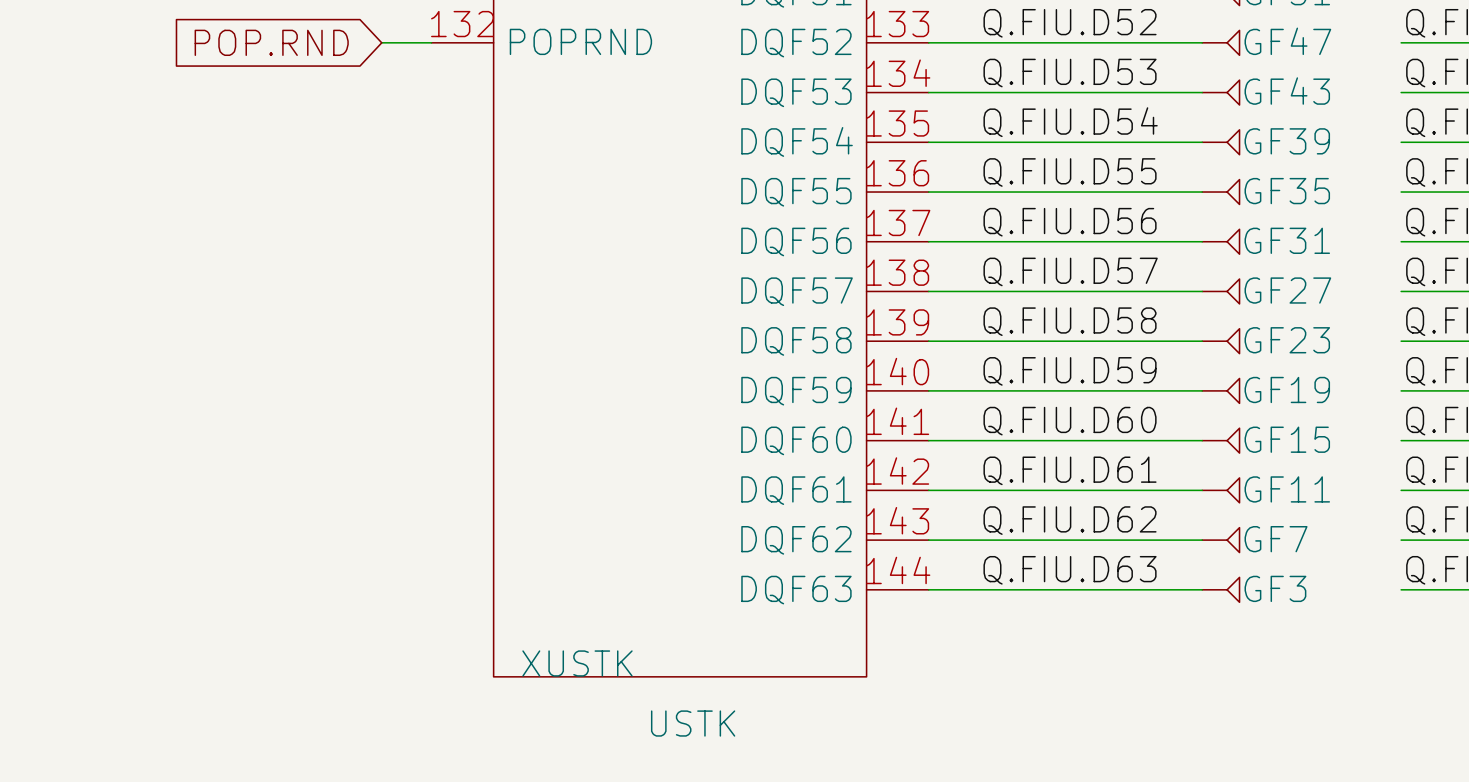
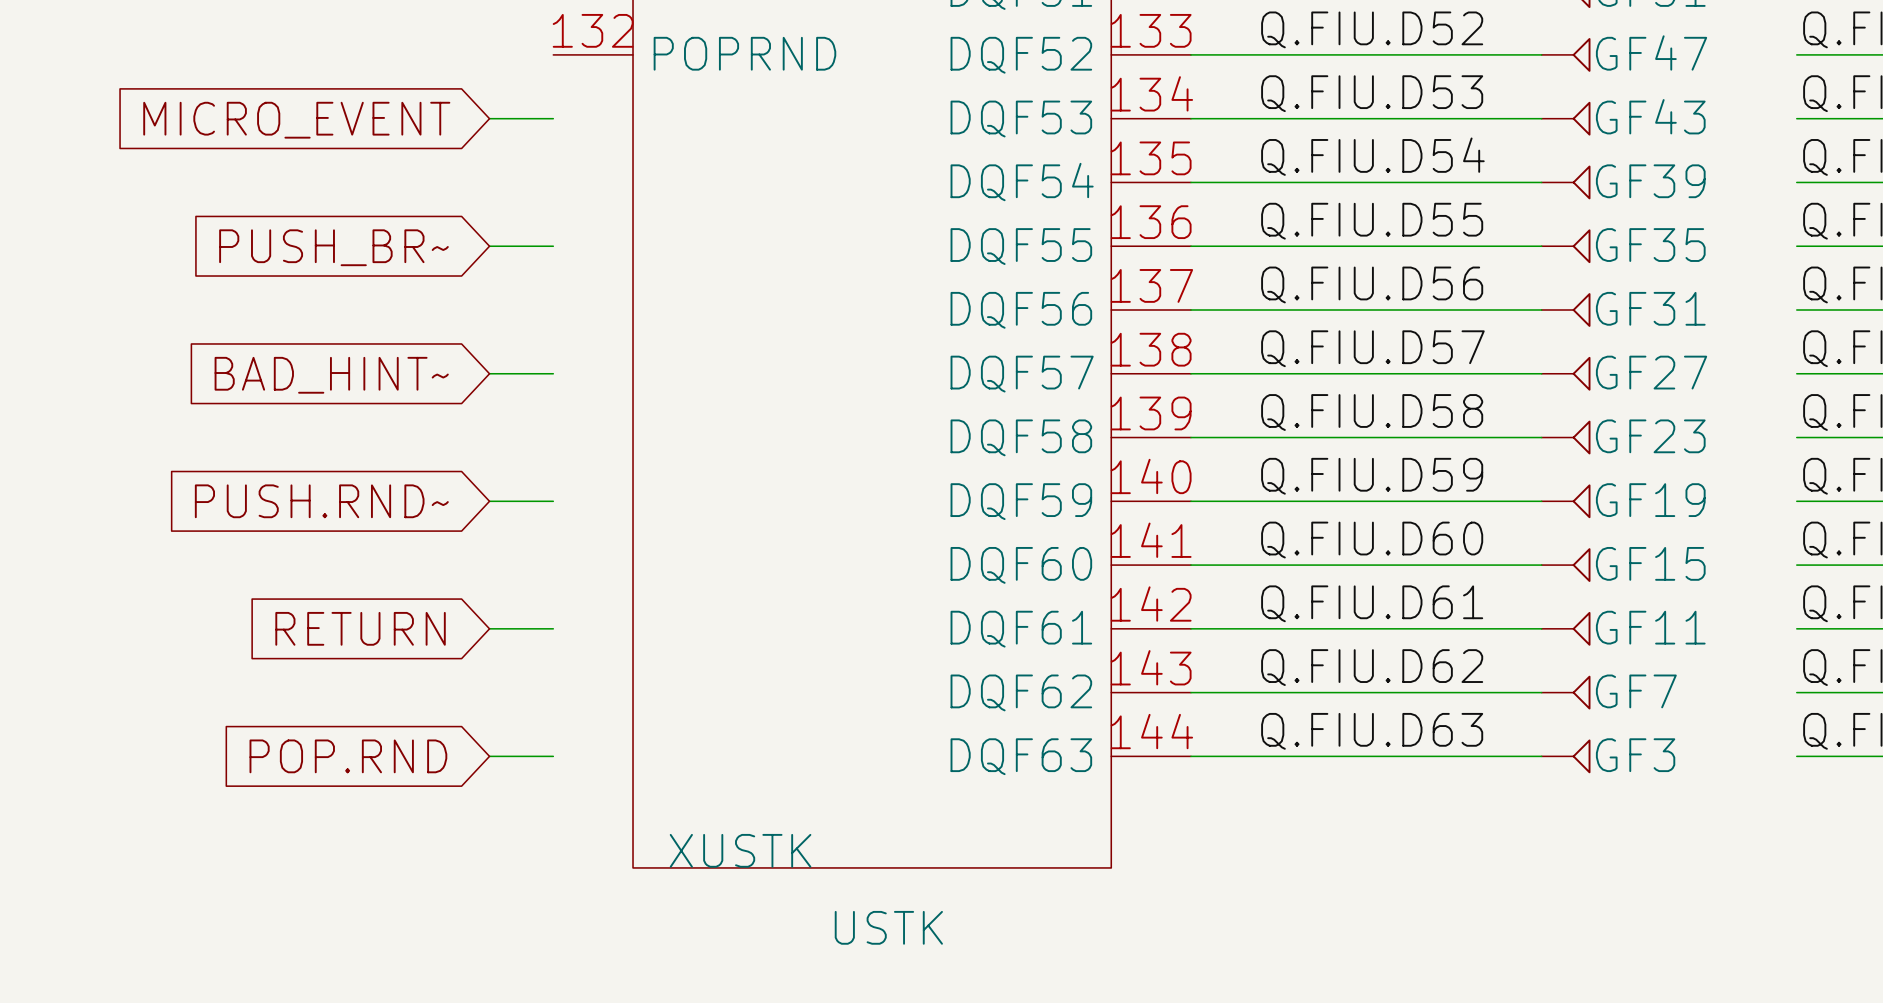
global label: POP.RND (271, 42) -> none
wire: (381, 42) (431, 42) -> (489, 118) (553, 118)
global label: none -> MICRO_EVENT (296, 120)
wire: none -> (489, 246) (553, 246)
global label: none -> PUSH_BR~ (333, 247)
wire: none -> (489, 373) (553, 373)
global label: none -> BAD_HINT~ (331, 375)
global label: none -> PUSH.RND~ (321, 501)
wire: none -> (489, 501) (553, 501)
global label: none -> RETURN (360, 628)
wire: none -> (489, 628) (553, 628)
global label: none -> POP.RND (348, 756)
wire: none -> (489, 756) (553, 756)

